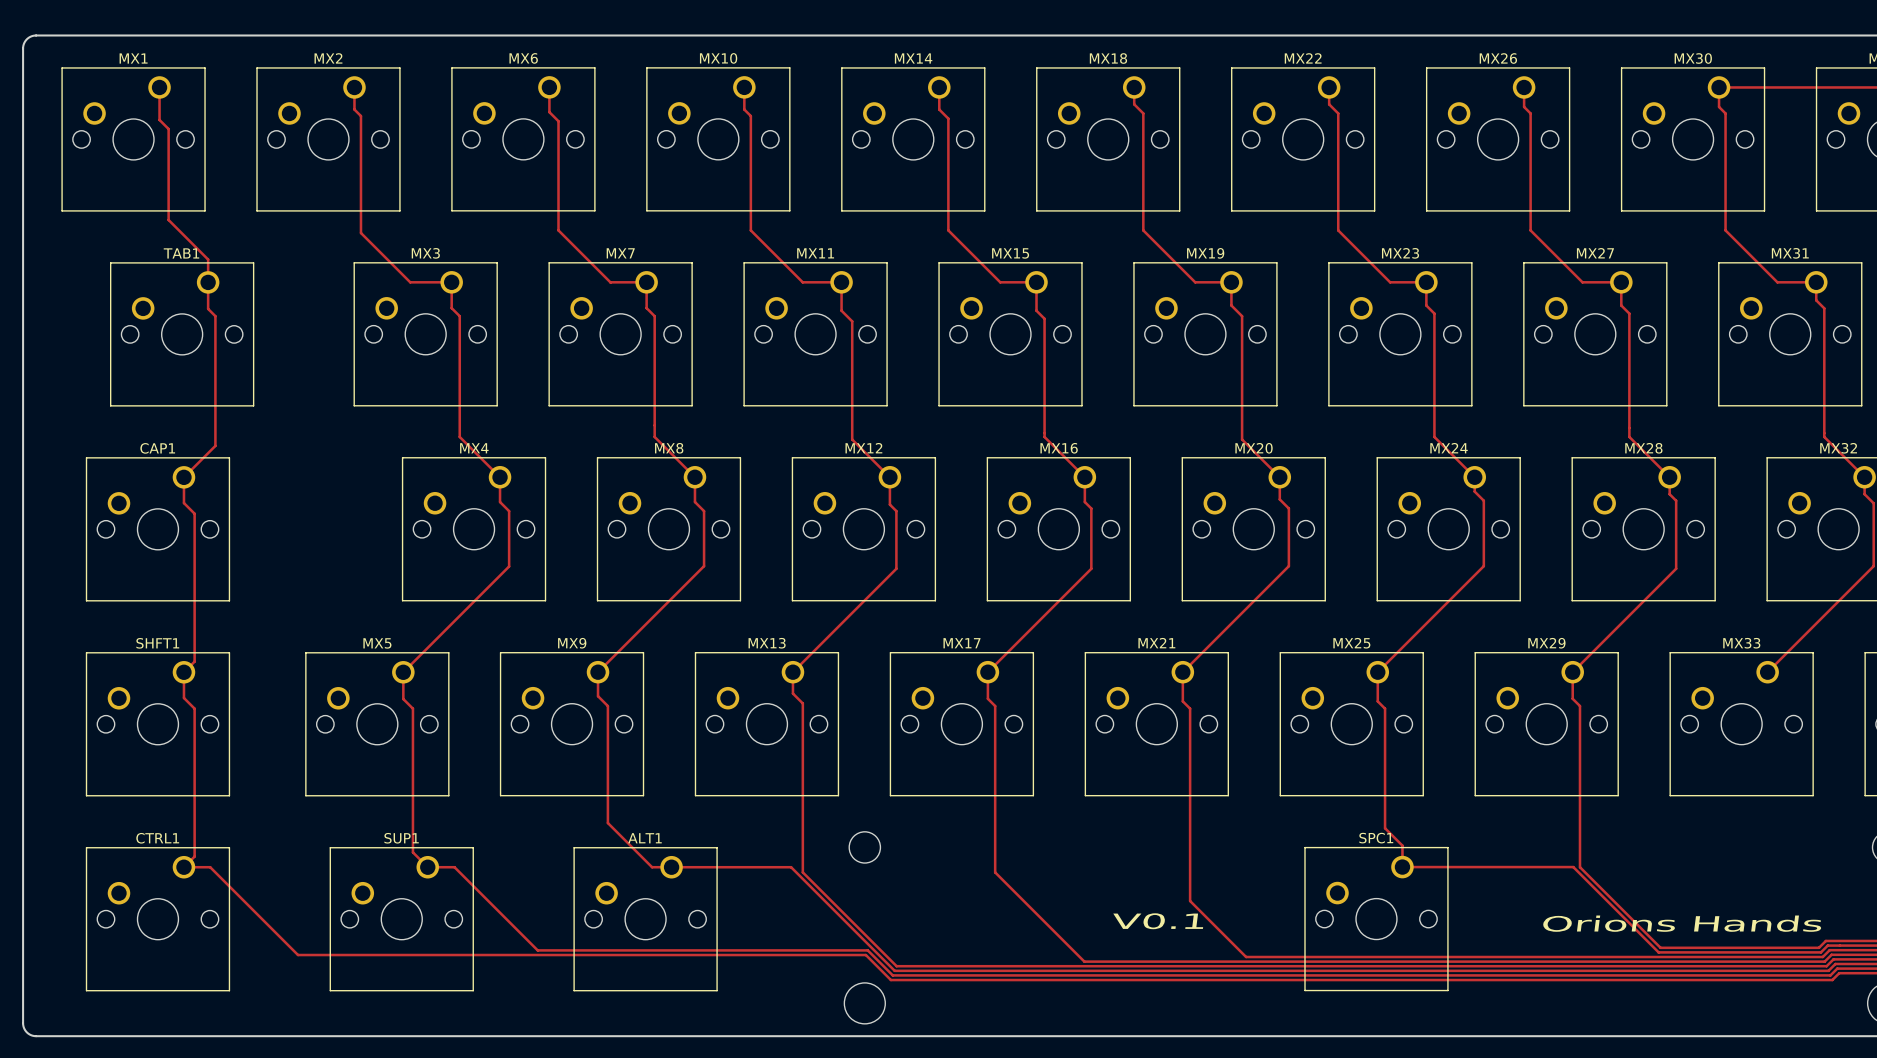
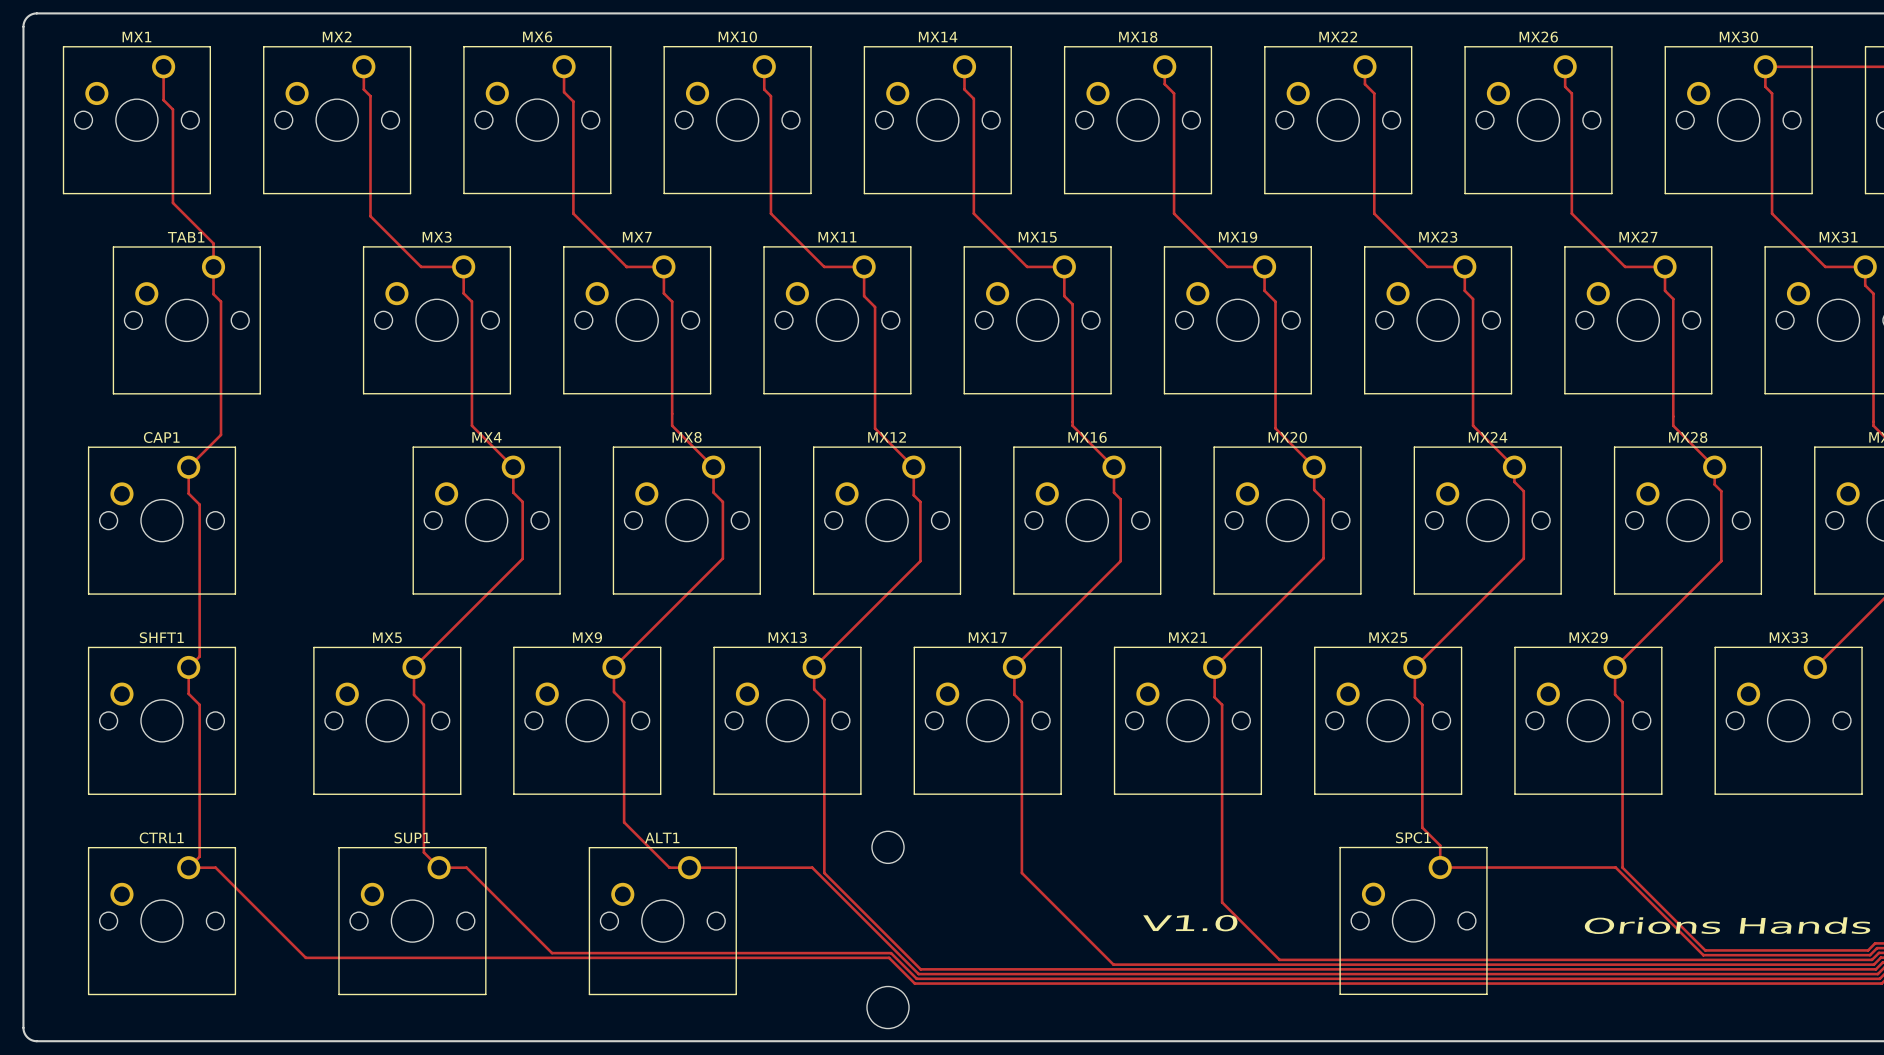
text: V0.1 (1158, 921) -> V1.0 (1190, 923)

